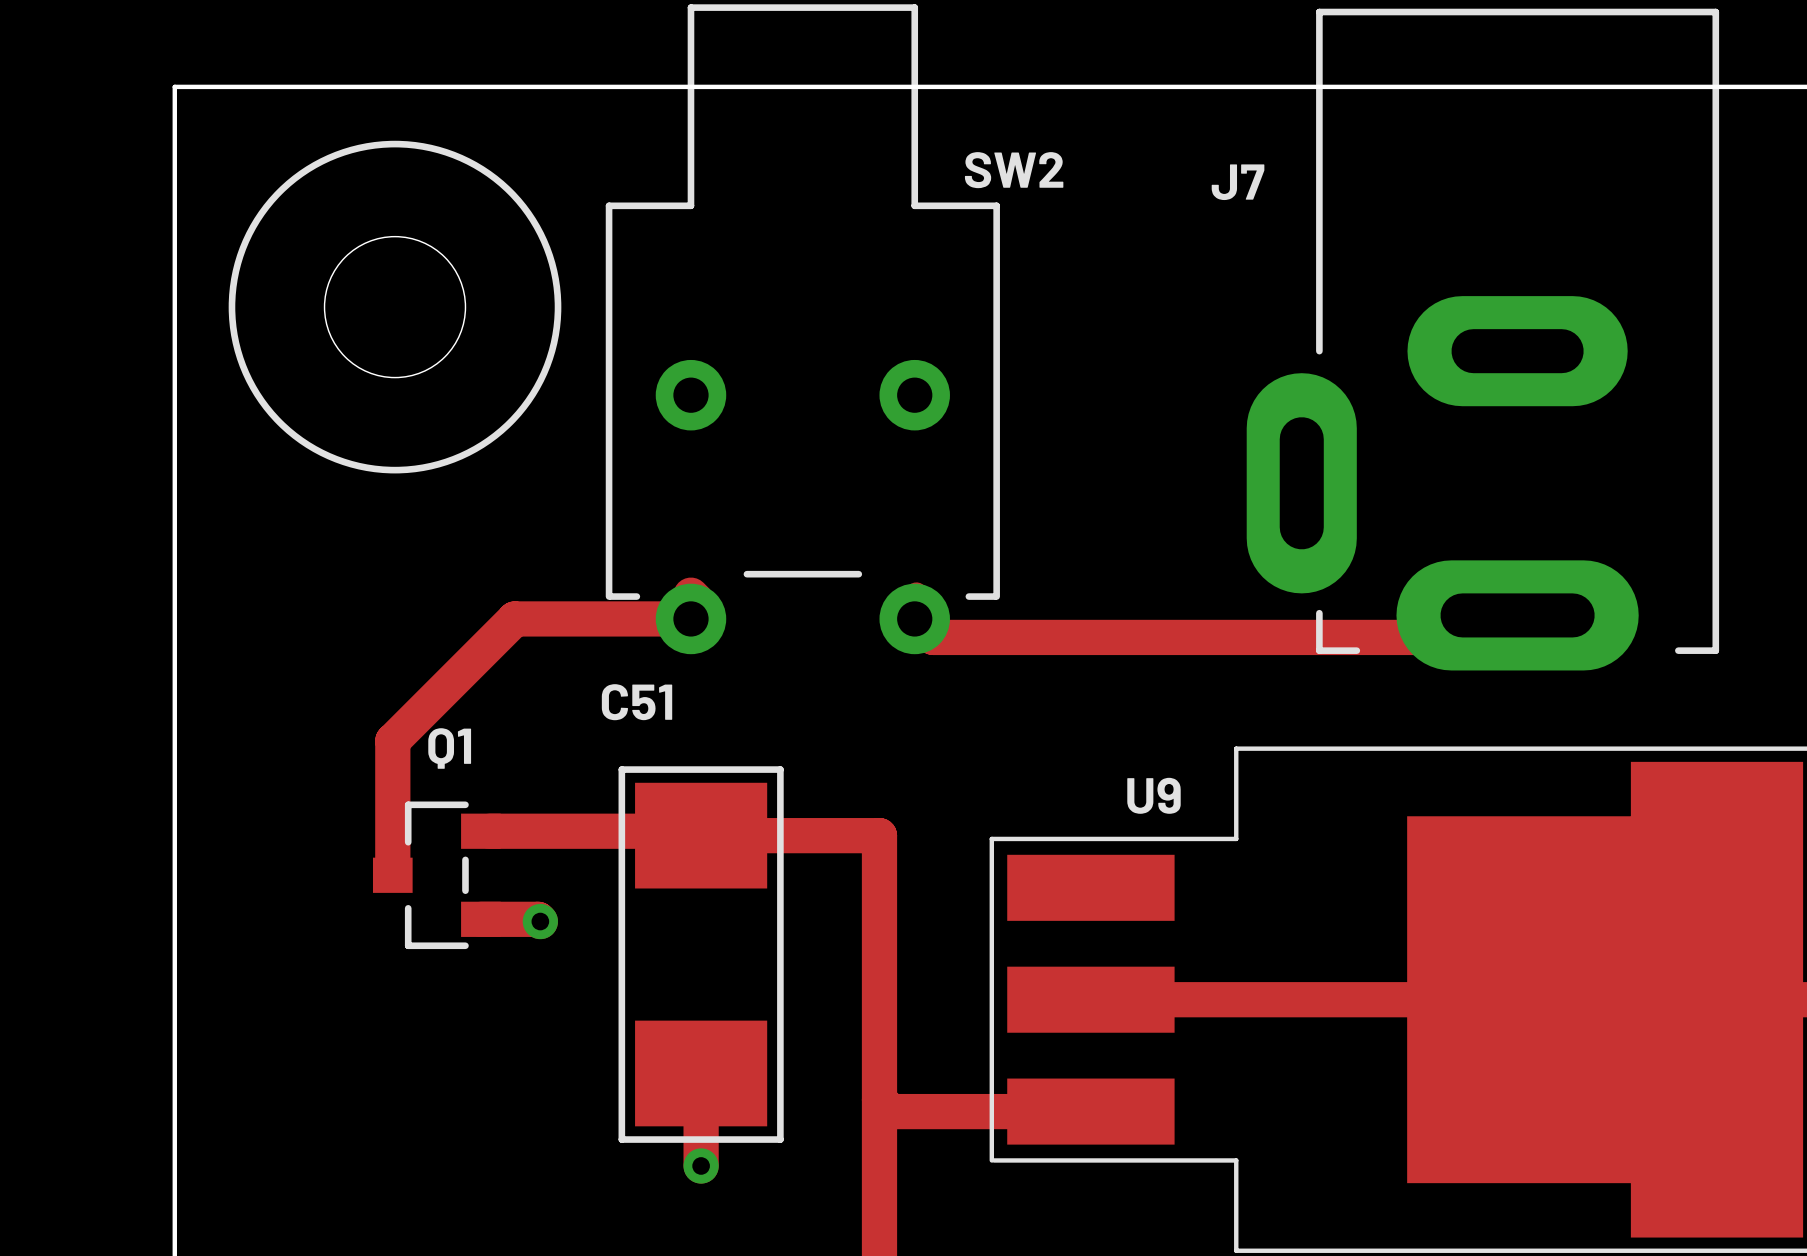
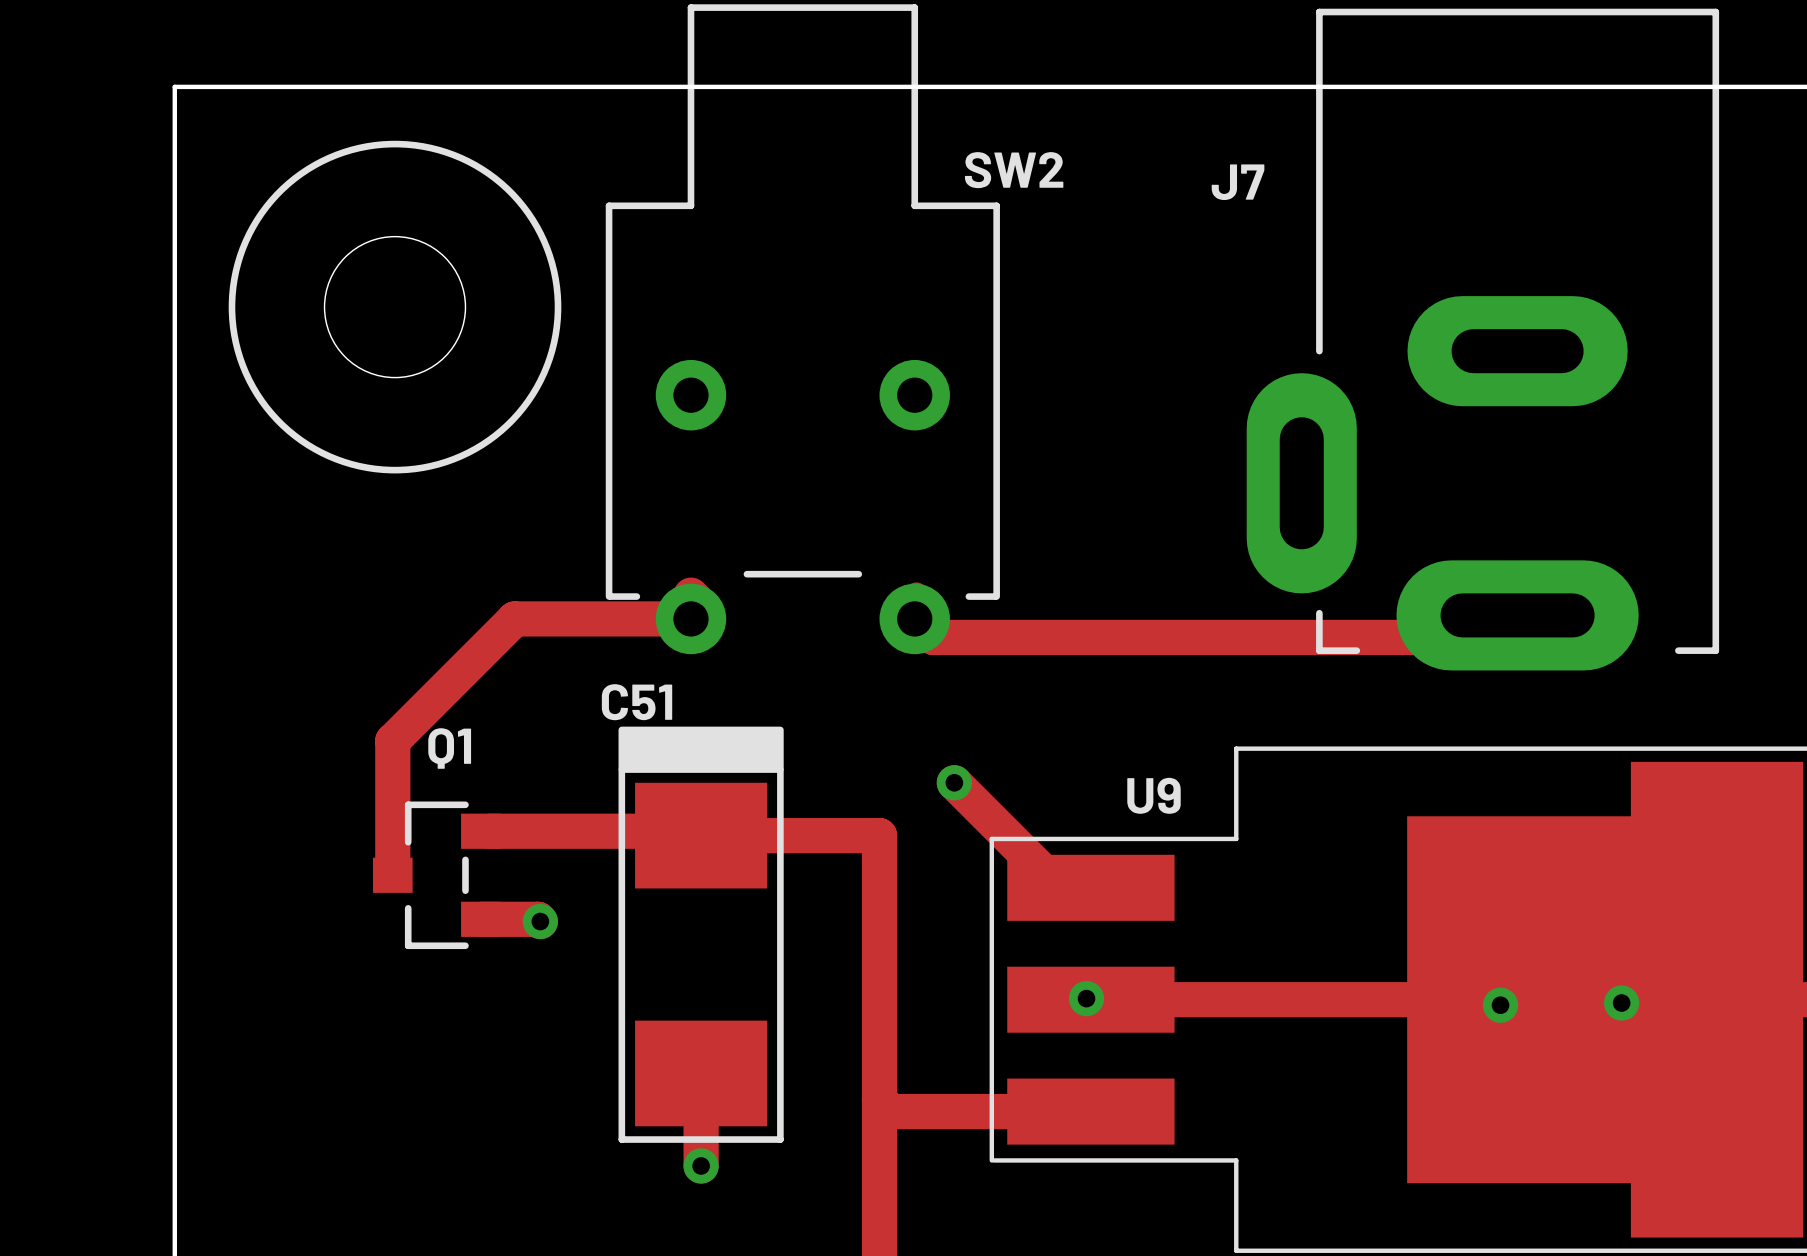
C51 footprint: [618, 766, 784, 1143] -> [618, 726, 784, 1143]
top track: none -> (954, 782) (1059, 887) (1090, 887)
via: none -> (954, 782)
via: none -> (1086, 998)
via: none -> (1621, 1003)
via: none -> (1500, 1005)

